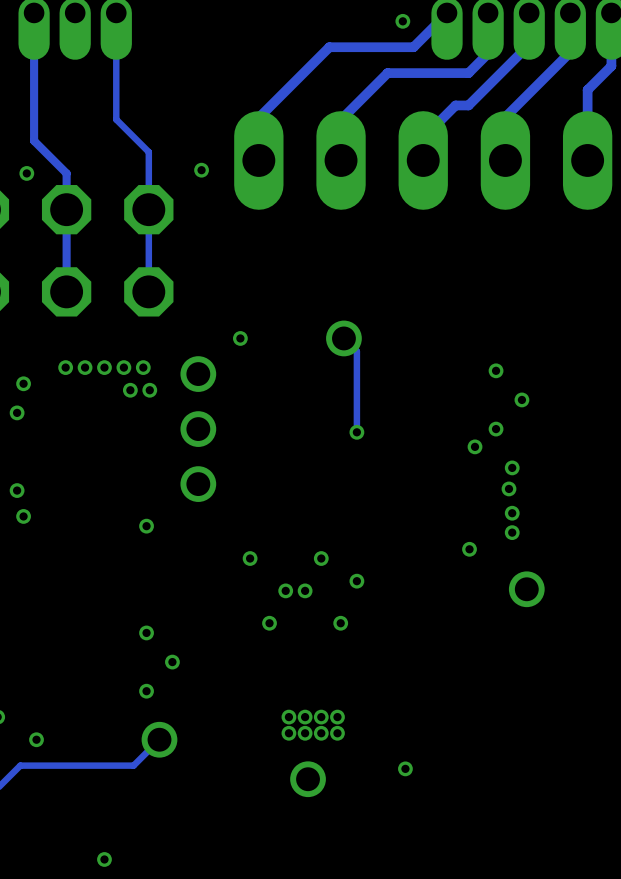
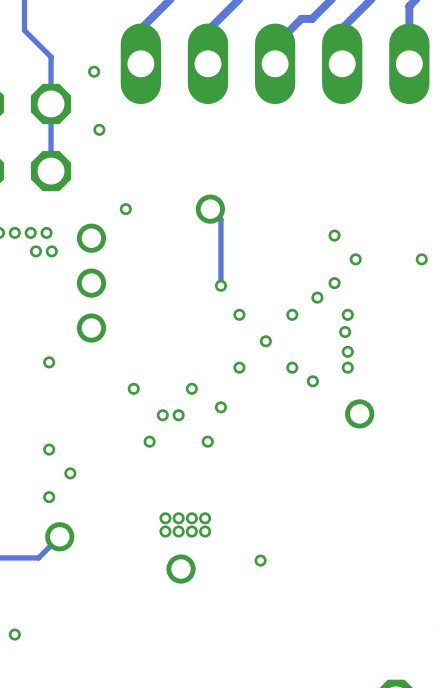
via: none -> (99, 129)
via: none -> (421, 259)
via: none -> (239, 314)
via: none -> (292, 314)
via: none -> (265, 341)
via: none -> (239, 367)
via: none -> (292, 367)

